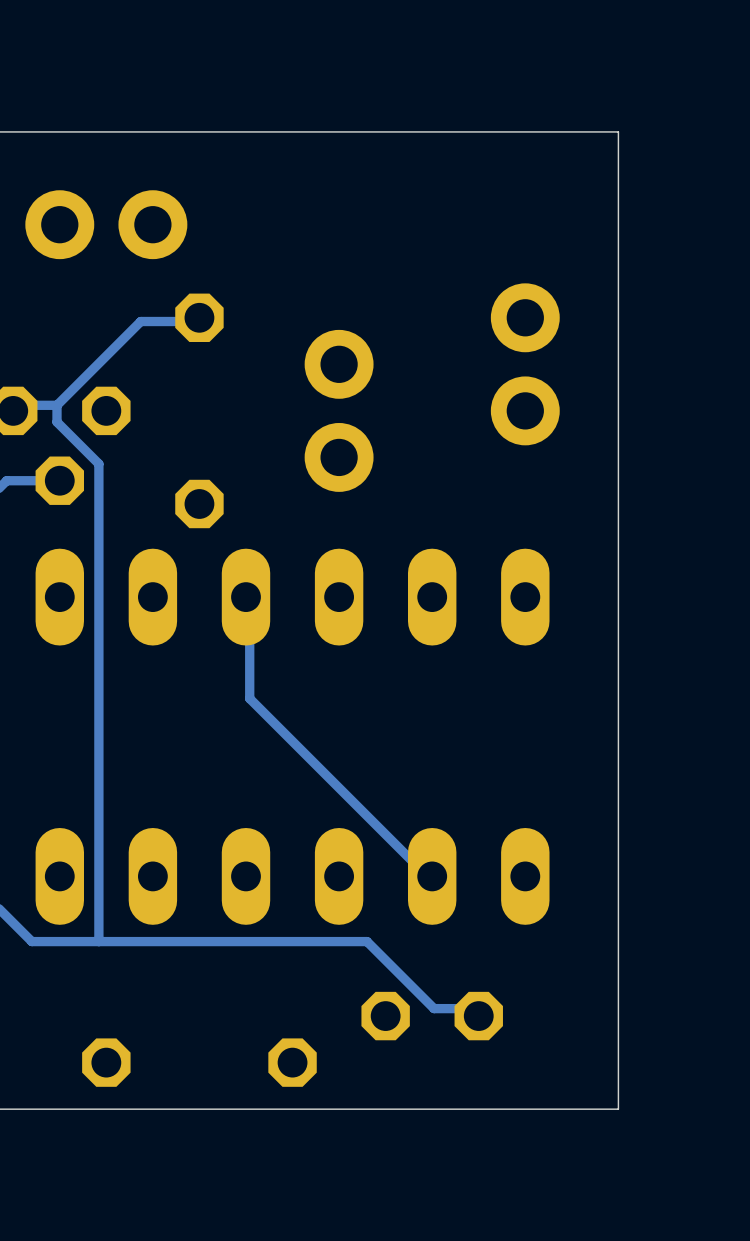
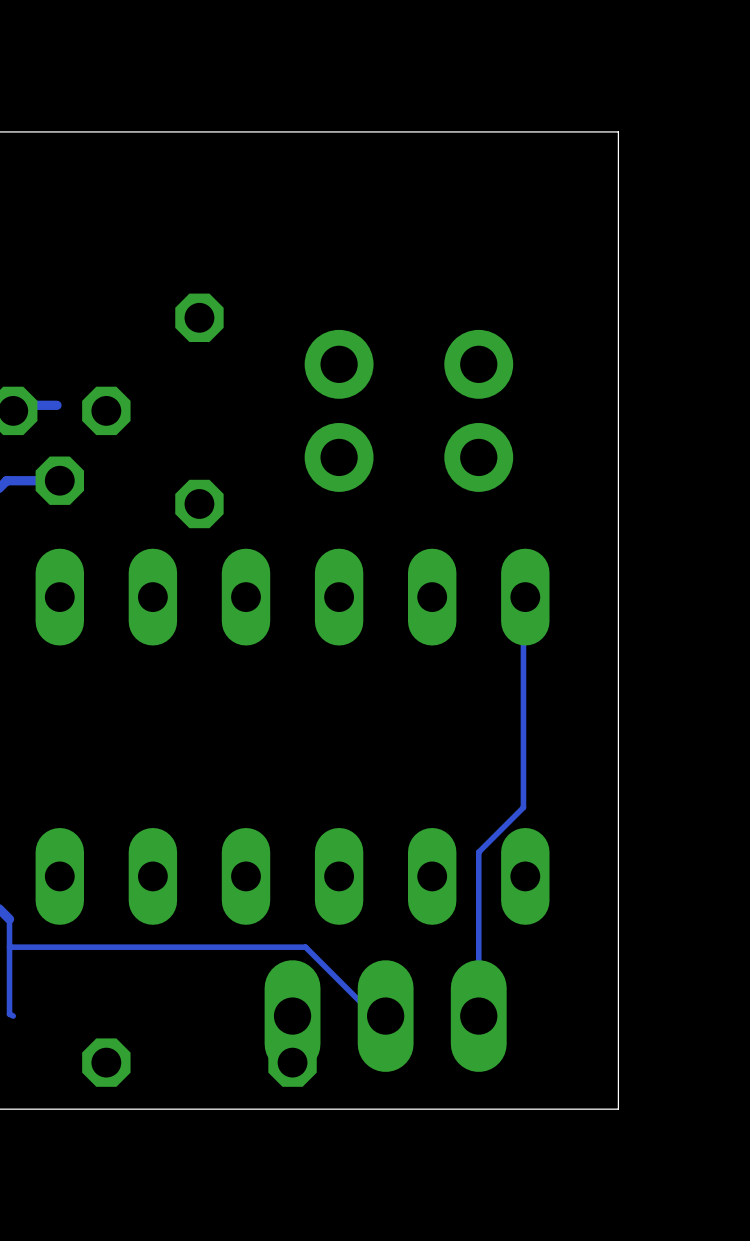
part: (106, 224) -> none
track: (199, 317) (199, 321) (140, 321) (56, 405) (56, 422) (98, 463) (98, 941) -> none
part position: (525, 364) -> (478, 410)
track: (245, 597) (249, 598) (249, 698) (425, 874) (432, 876) -> none
track: none -> (525, 597) (523, 600) (523, 807) (478, 852) (478, 1016)
track: (9, 919) (31, 941) (367, 941) (434, 1008) (475, 1008) (478, 1016) -> (9, 919) (9, 1014) (13, 1016)
track: none -> (9, 947) (305, 947) (372, 1014) (383, 1014) (385, 1016)
part: none -> (385, 1016)
part: (432, 1016) -> none

